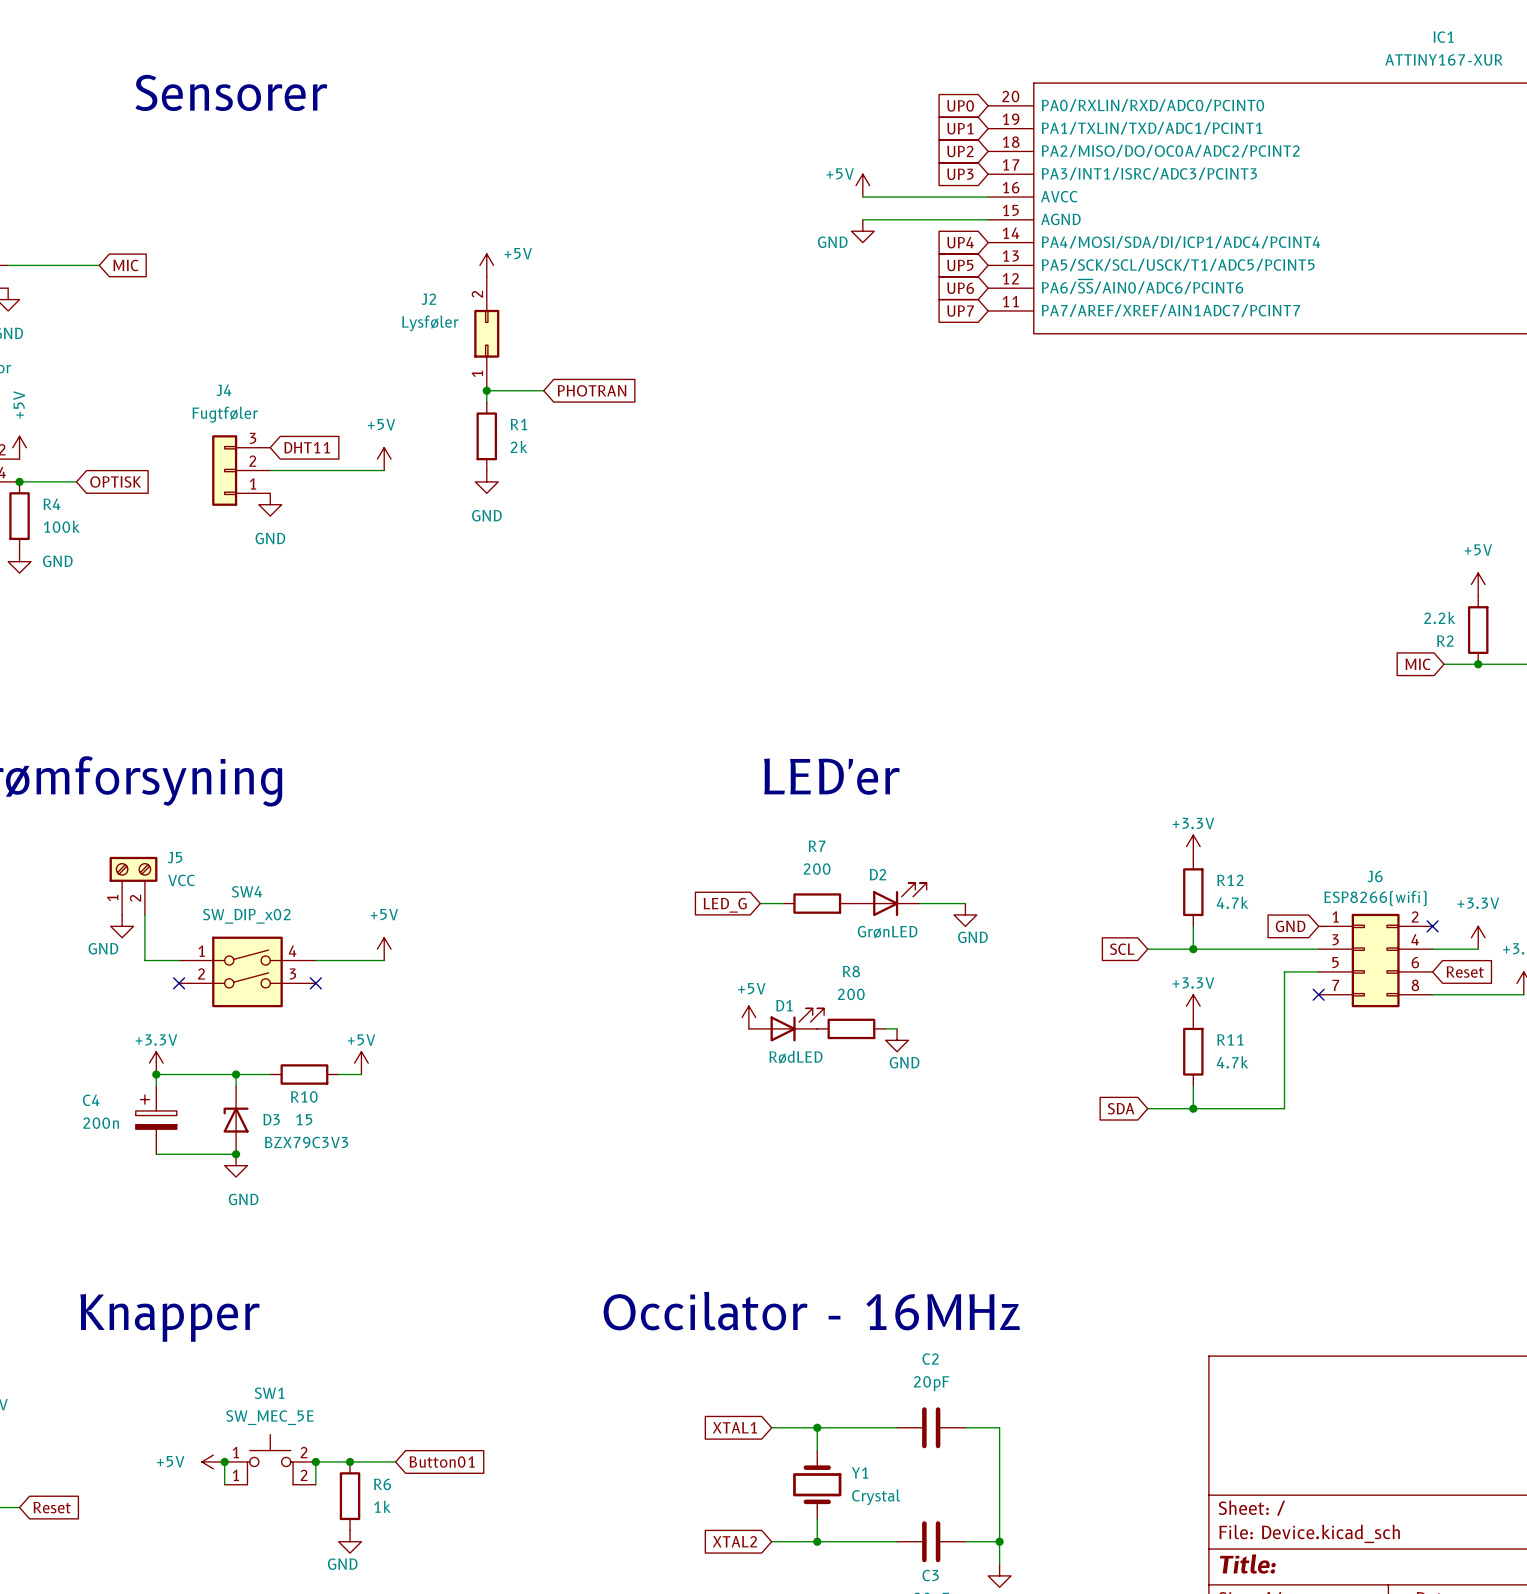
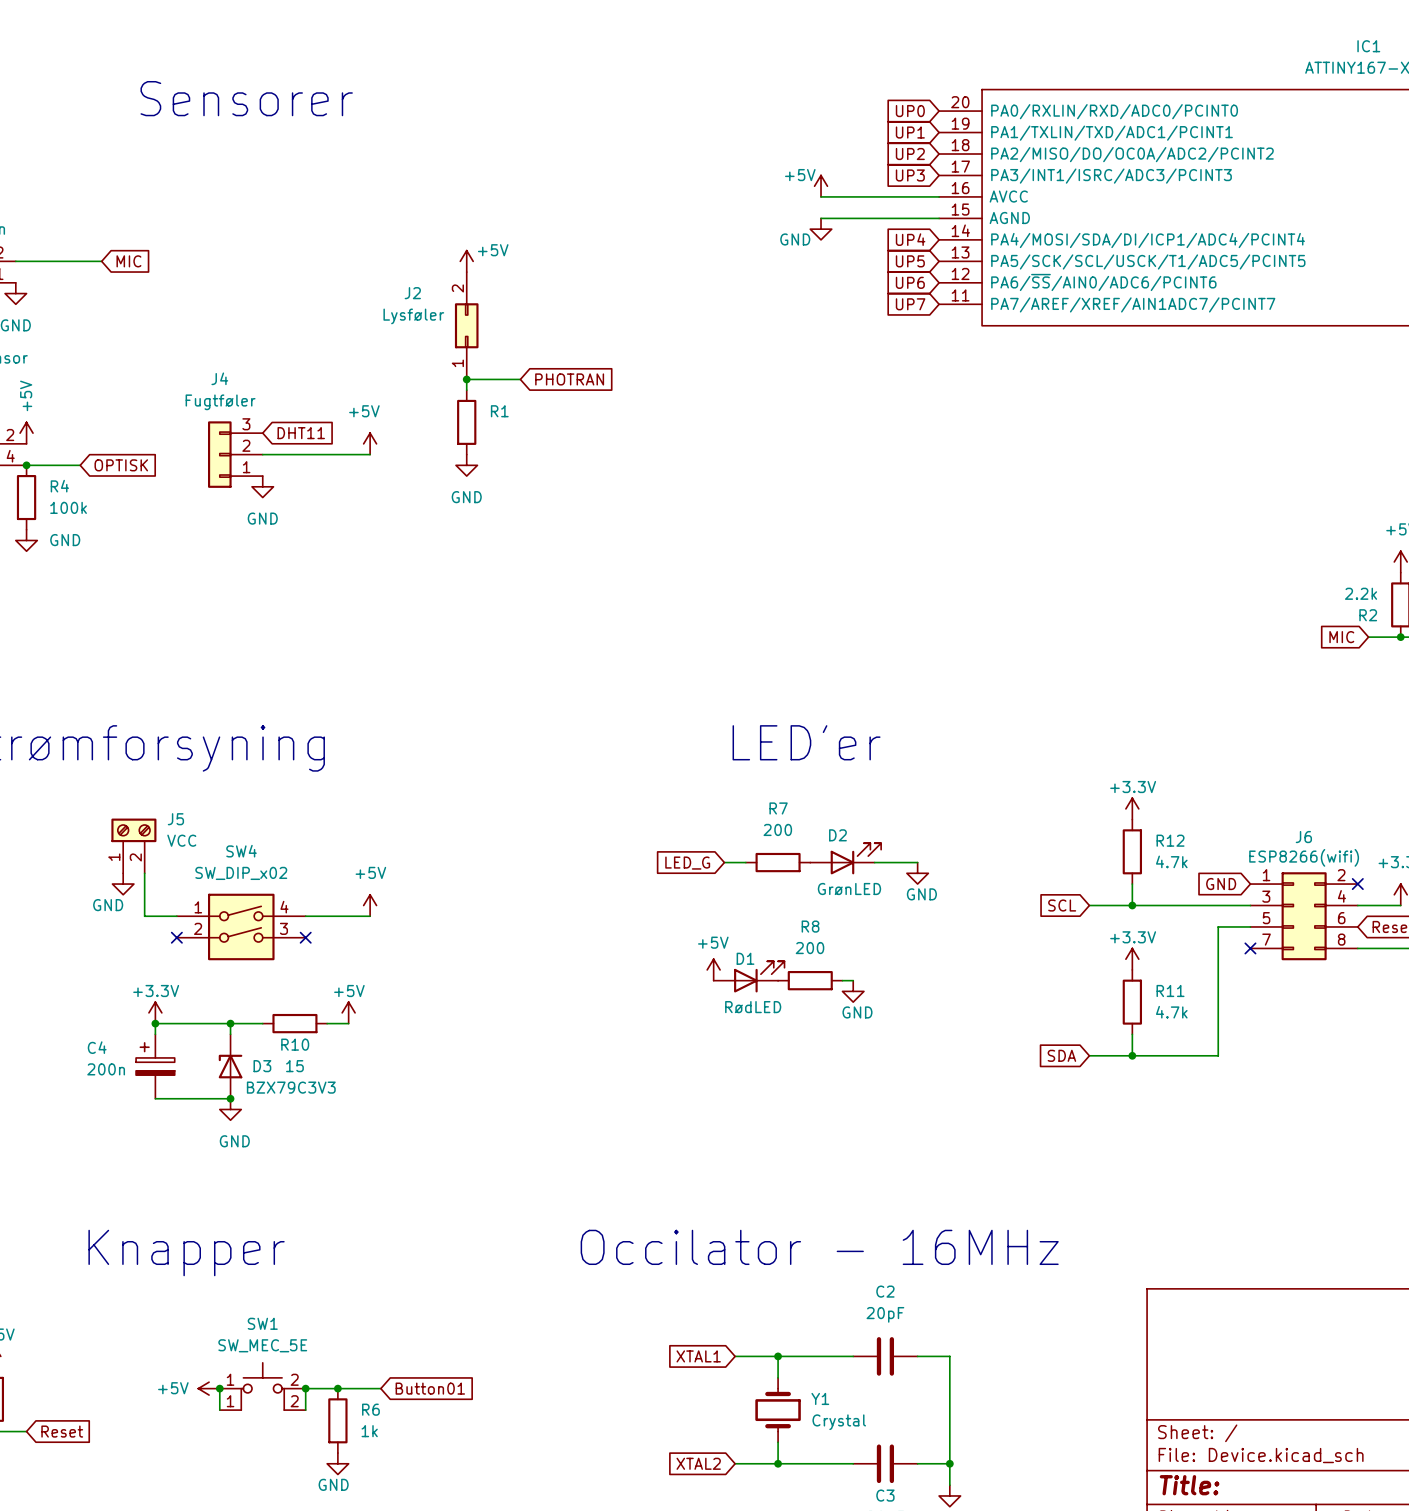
R1 value: 2k (519, 446) -> none

